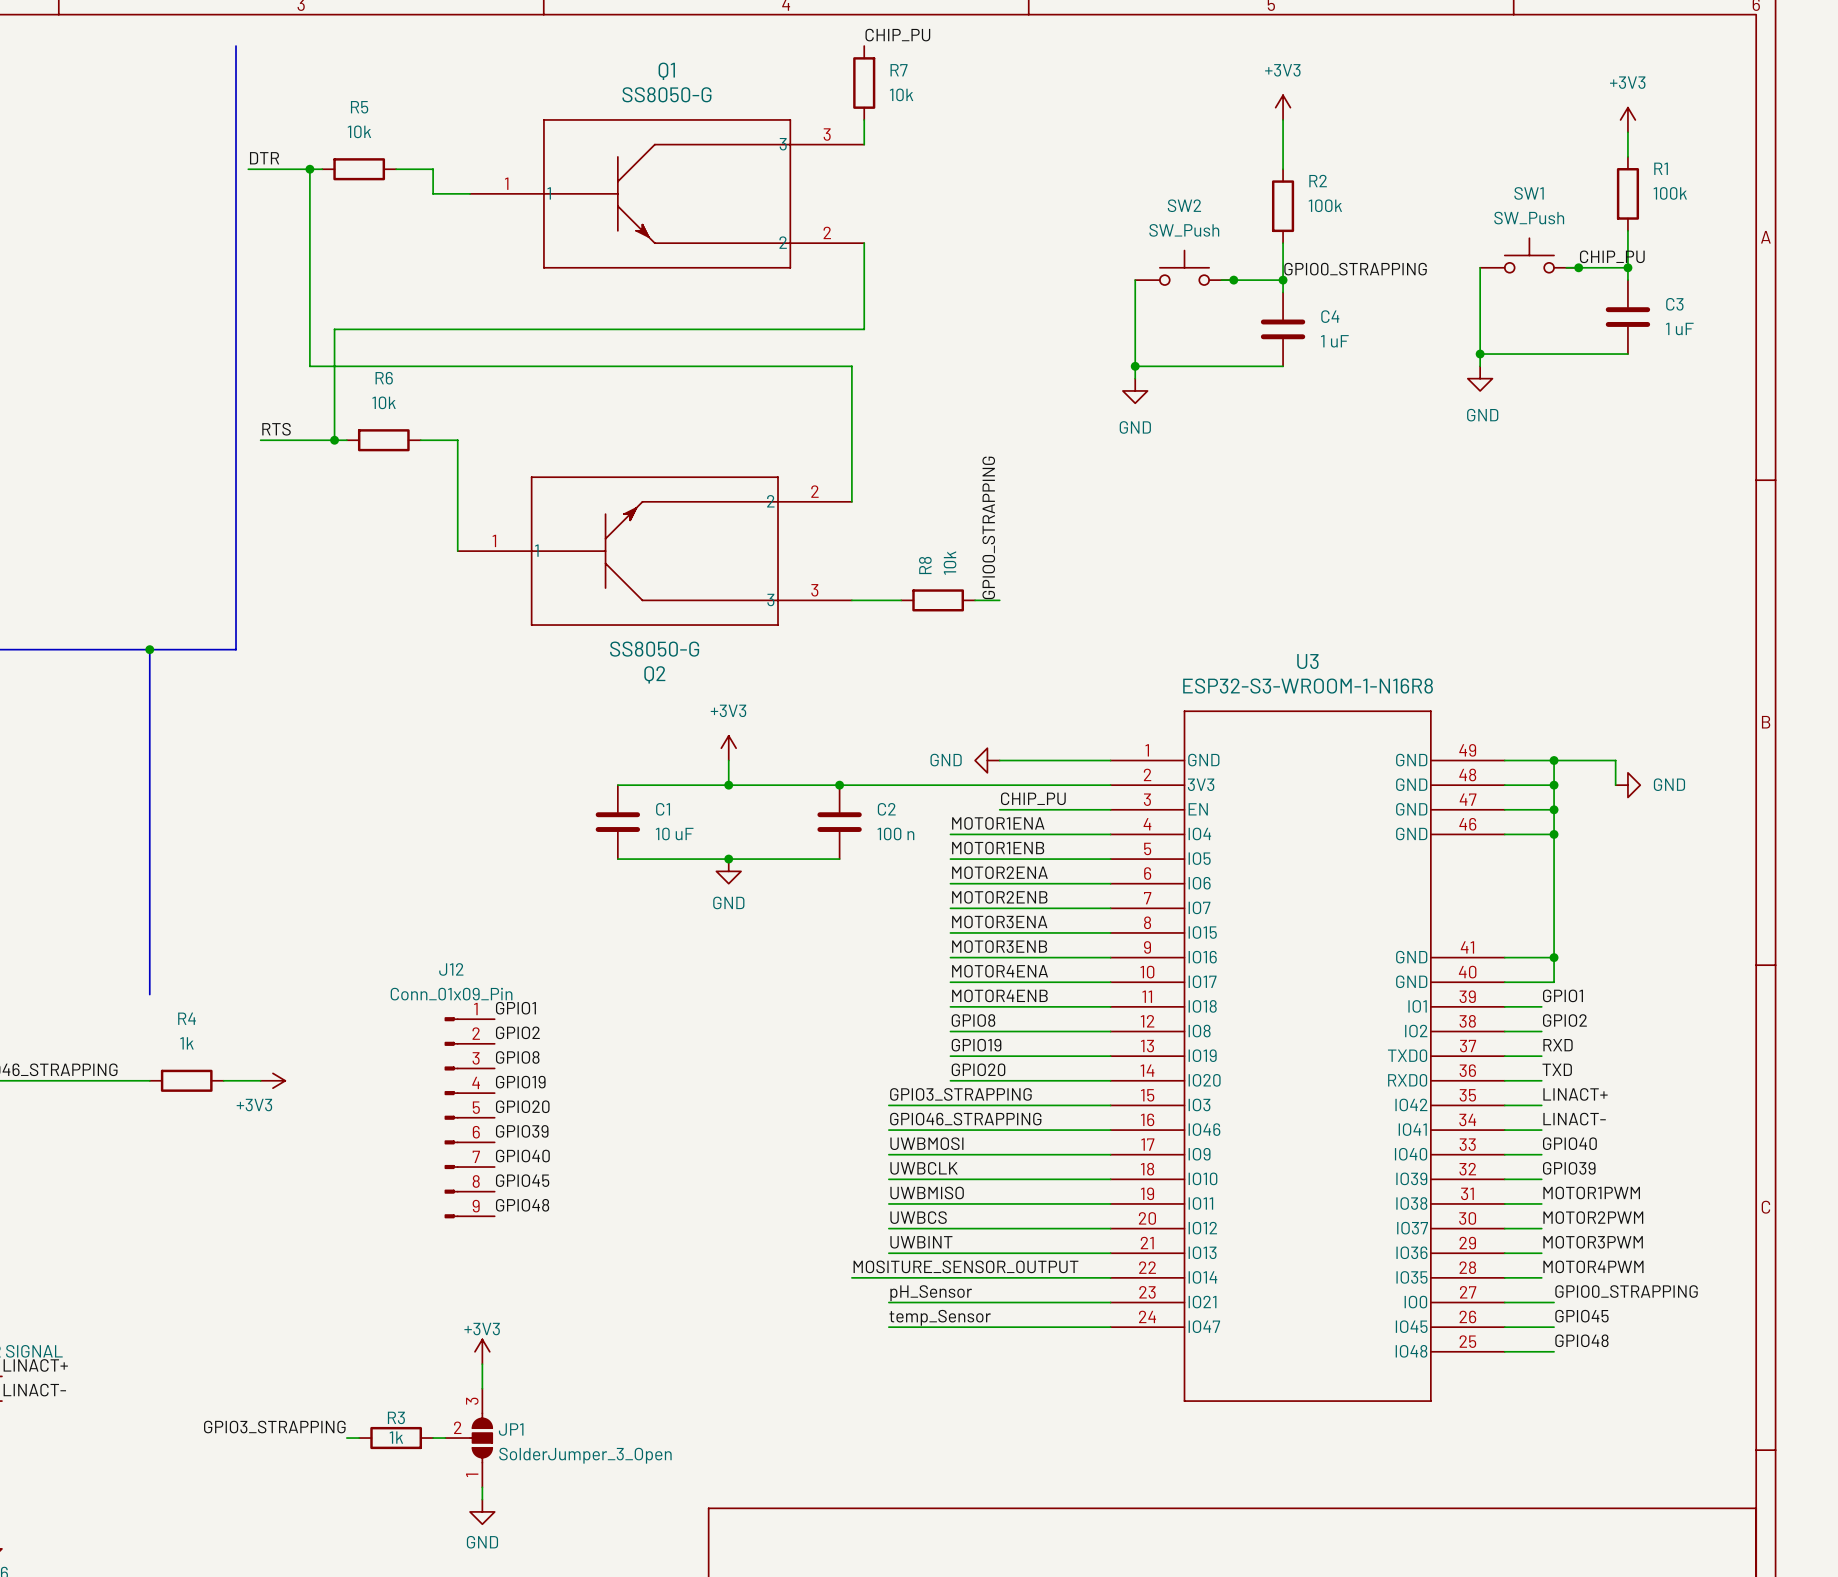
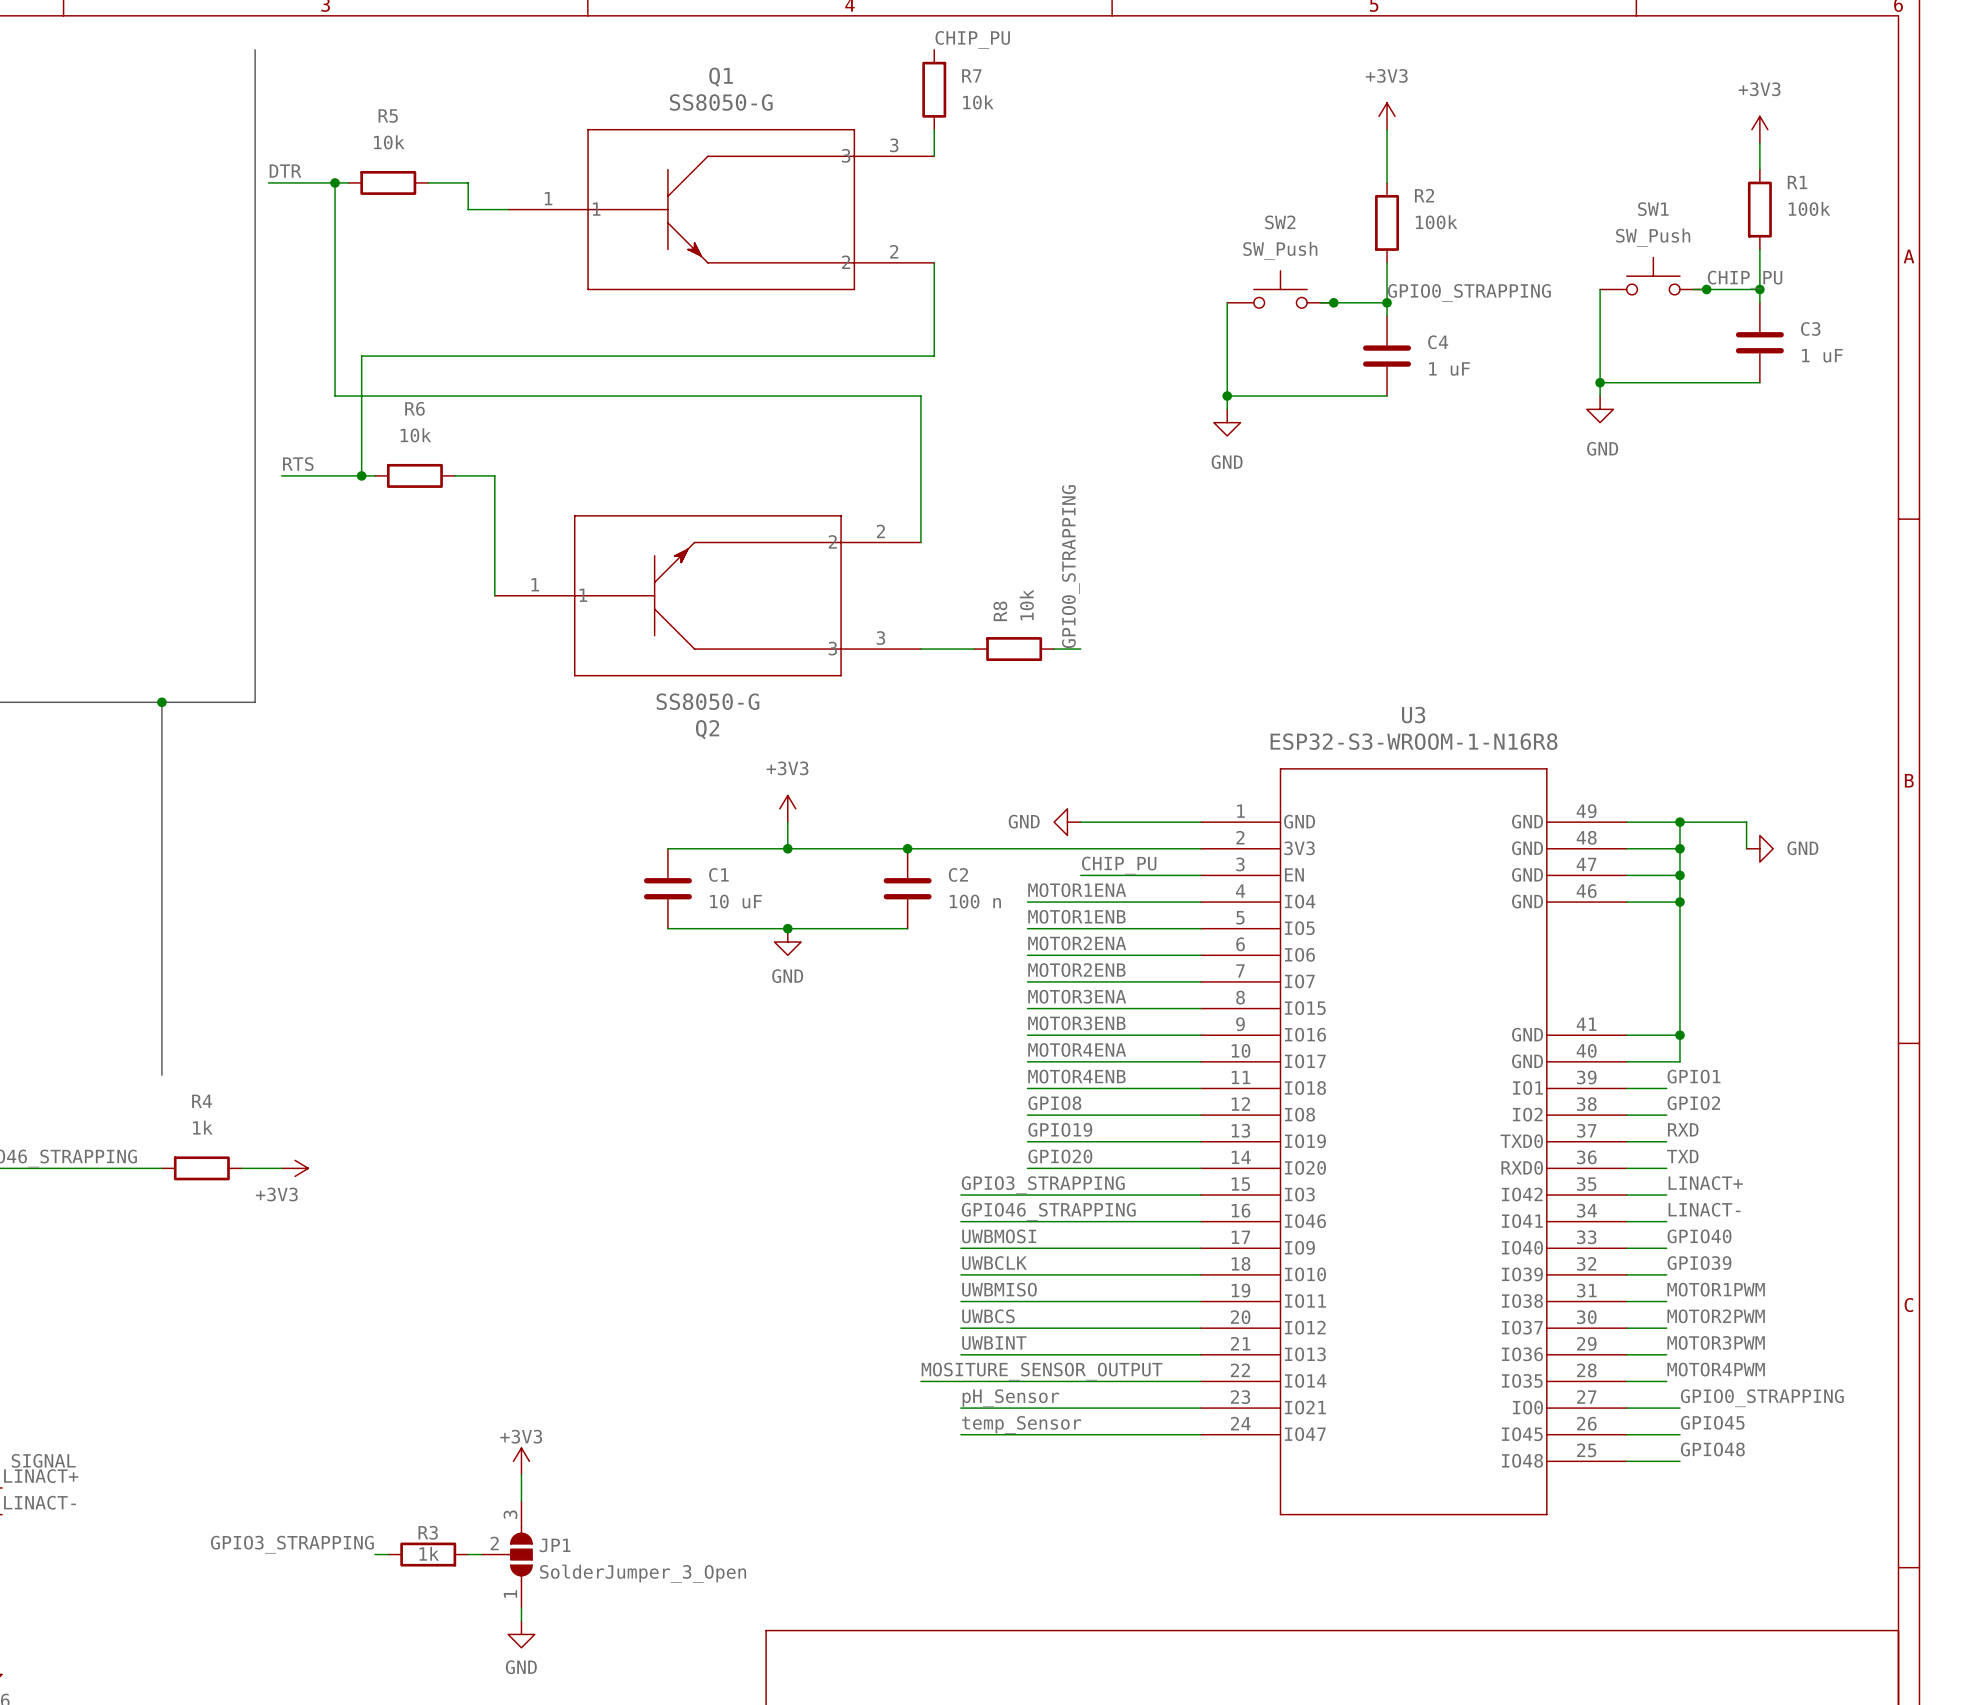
label: GPIO1 (515, 1008) -> none
label: GPIO2 (517, 1032) -> none
label: GPIO8 (517, 1057) -> none
label: GPIO19 (520, 1082) -> none
label: GPIO20 (522, 1106) -> none
J12: Conn_01x09_Pin (469, 1117) -> none
label: GPIO39 (522, 1131) -> none
label: GPIO40 (522, 1156) -> none
label: GPIO45 (522, 1180) -> none
label: GPIO48 (522, 1205) -> none

